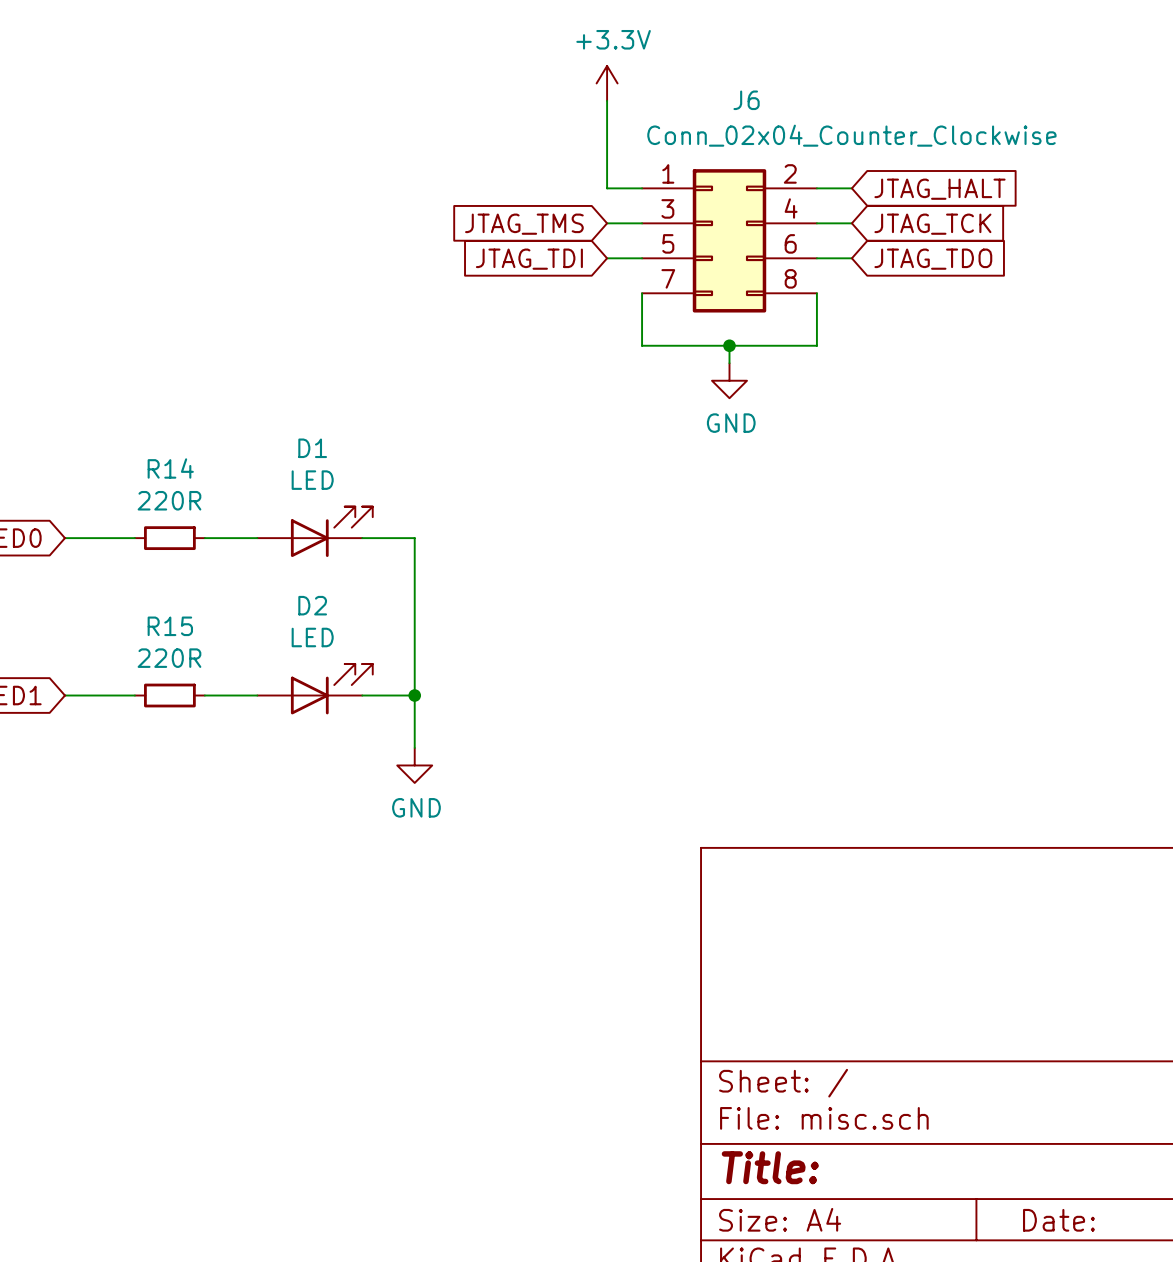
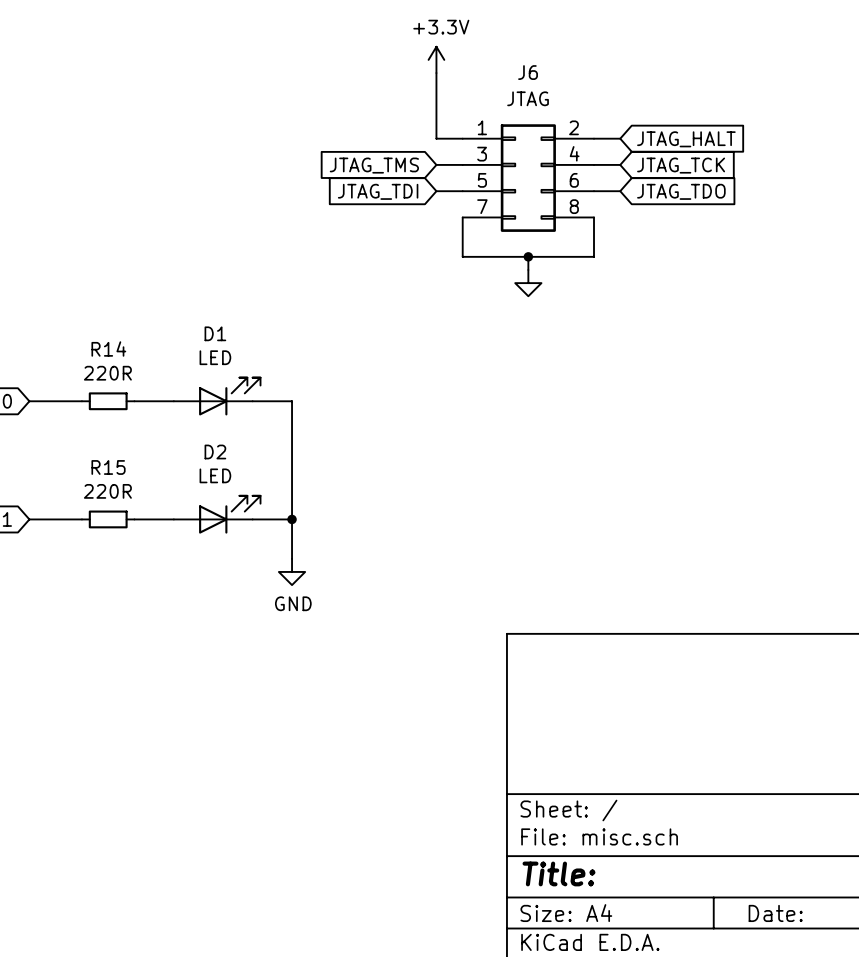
J6 name position: J6 (746, 100) -> J6 (528, 72)
J6 value: Conn_02x04_Counter_Clockwise (851, 135) -> JTAG (528, 98)
power symbol text: GND (731, 423) -> none

